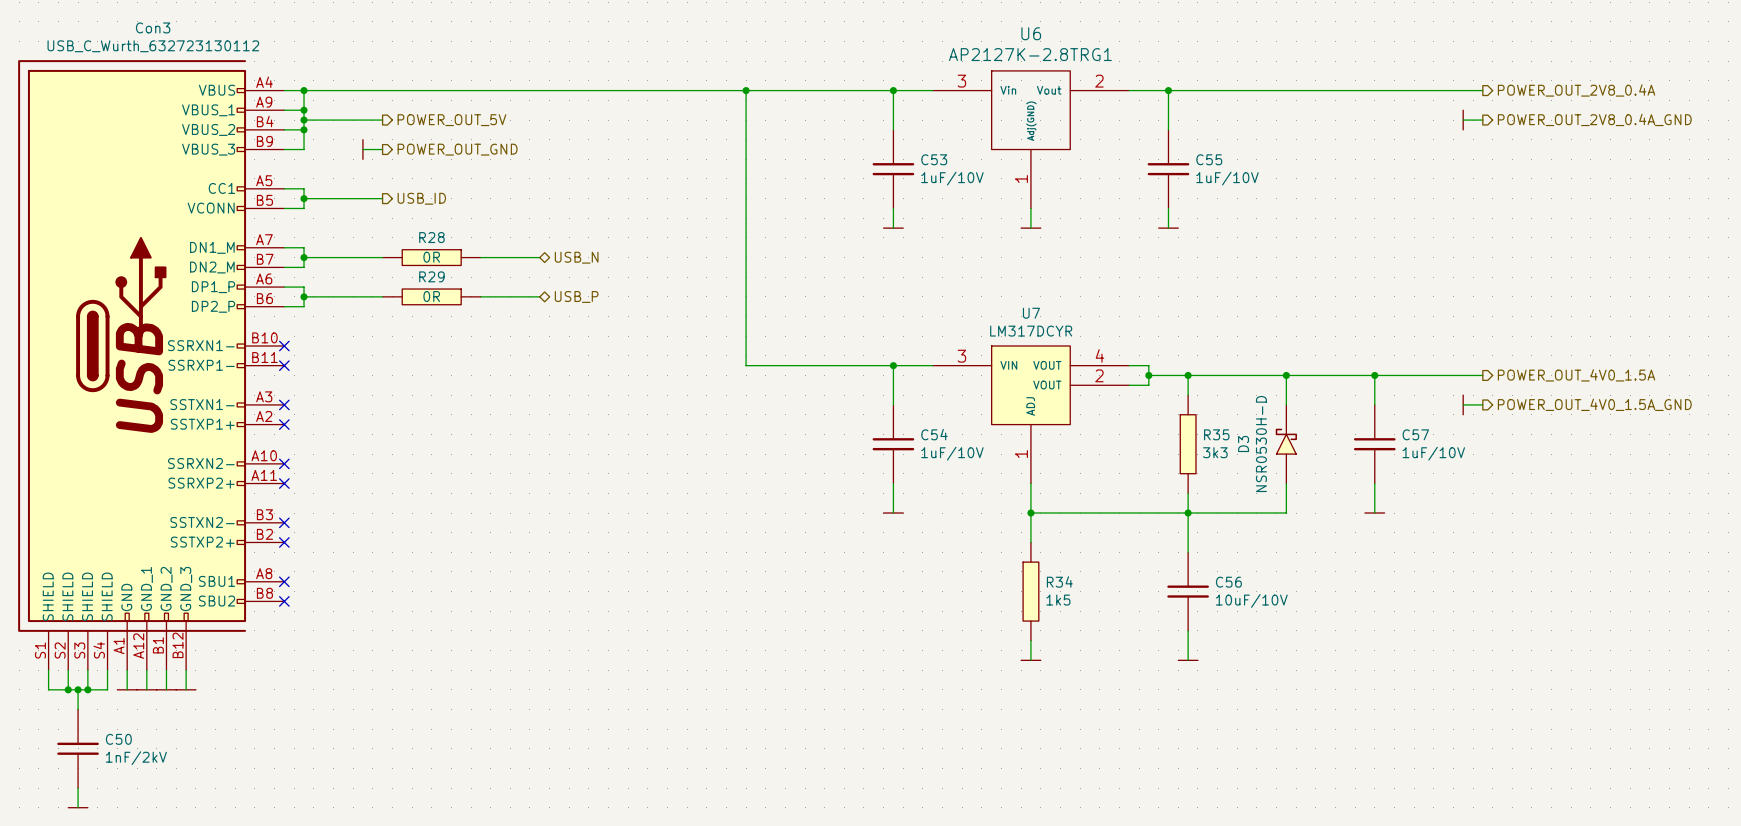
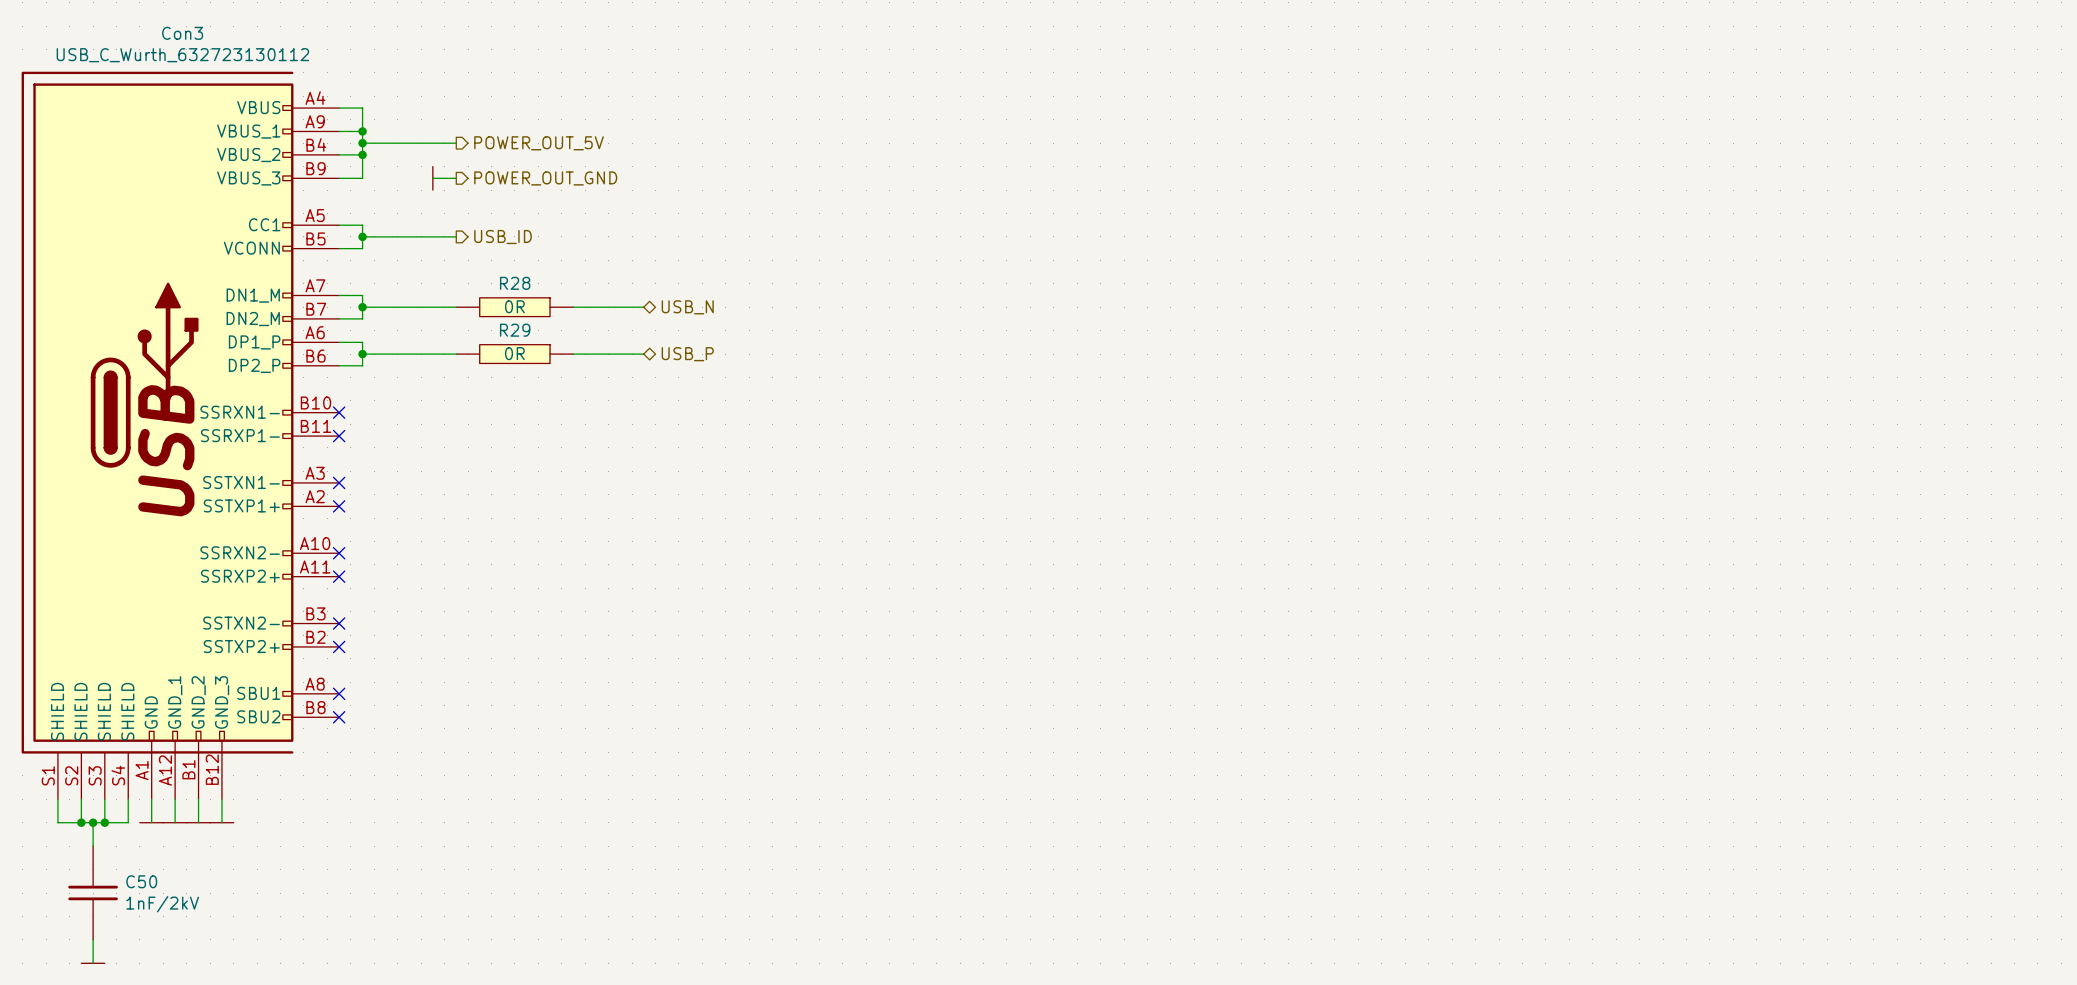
wire: (304, 90) (932, 90) -> none
junction: (304, 90) -> none
wire: (746, 90) (746, 365) (932, 365) -> none
junction: (746, 90) -> none
wire: (893, 90) (893, 129) -> none
junction: (893, 90) -> none
wire: (1129, 90) (1482, 90) -> none
wire: (1168, 90) (1168, 129) -> none
junction: (1168, 90) -> none
hierarchical label: POWER_OUT_2V8_0.4A (1576, 90) -> none
hierarchical label: POWER_OUT_2V8_0.4A_GND (1594, 119) -> none
wire: (1463, 120) (1482, 120) -> none
power symbol: (1463, 120) -> none
U6: AP2127K-2.8TRG1 (1030, 139) -> none
C53: 1uF/10V (893, 169) -> none
C55: 1uF/10V (1168, 169) -> none
wire: (893, 208) (893, 228) -> none
wire: (1030, 208) (1030, 228) -> none
wire: (1168, 208) (1168, 228) -> none
power symbol: (893, 228) -> none
power symbol: (1030, 228) -> none
power symbol: (1168, 228) -> none
wire: (893, 365) (893, 404) -> none
junction: (893, 365) -> none
wire: (1129, 365) (1148, 365) (1148, 385) (1129, 385) -> none
wire: (1148, 375) (1482, 375) -> none
junction: (1148, 375) -> none
wire: (1188, 375) (1188, 395) -> none
junction: (1188, 375) -> none
wire: (1286, 375) (1286, 404) -> none
junction: (1286, 375) -> none
wire: (1374, 375) (1374, 404) -> none
junction: (1374, 375) -> none
hierarchical label: POWER_OUT_4V0_1.5A (1576, 375) -> none
wire: (1463, 404) (1482, 404) -> none
power symbol: (1463, 404) -> none
hierarchical label: POWER_OUT_4V0_1.5A_GND (1594, 404) -> none
U7: LM317DCYR (1030, 414) -> none
C54: 1uF/10V (893, 444) -> none
R35: 3k3 (1188, 444) -> none
D3: NSR0530H-D (1286, 444) -> none
C57: 1uF/10V (1374, 444) -> none
wire: (893, 483) (893, 513) -> none
wire: (1030, 483) (1030, 542) -> none
wire: (1286, 483) (1286, 513) (1030, 513) -> none
wire: (1374, 483) (1374, 513) -> none
wire: (1188, 493) (1188, 552) -> none
power symbol: (893, 513) -> none
junction: (1030, 513) -> none
junction: (1188, 513) -> none
power symbol: (1374, 513) -> none
R34: 1k5 (1030, 591) -> none
C56: 10uF/10V (1188, 591) -> none
wire: (1188, 630) (1188, 660) -> none
wire: (1030, 640) (1030, 660) -> none
power symbol: (1030, 660) -> none
power symbol: (1188, 660) -> none

